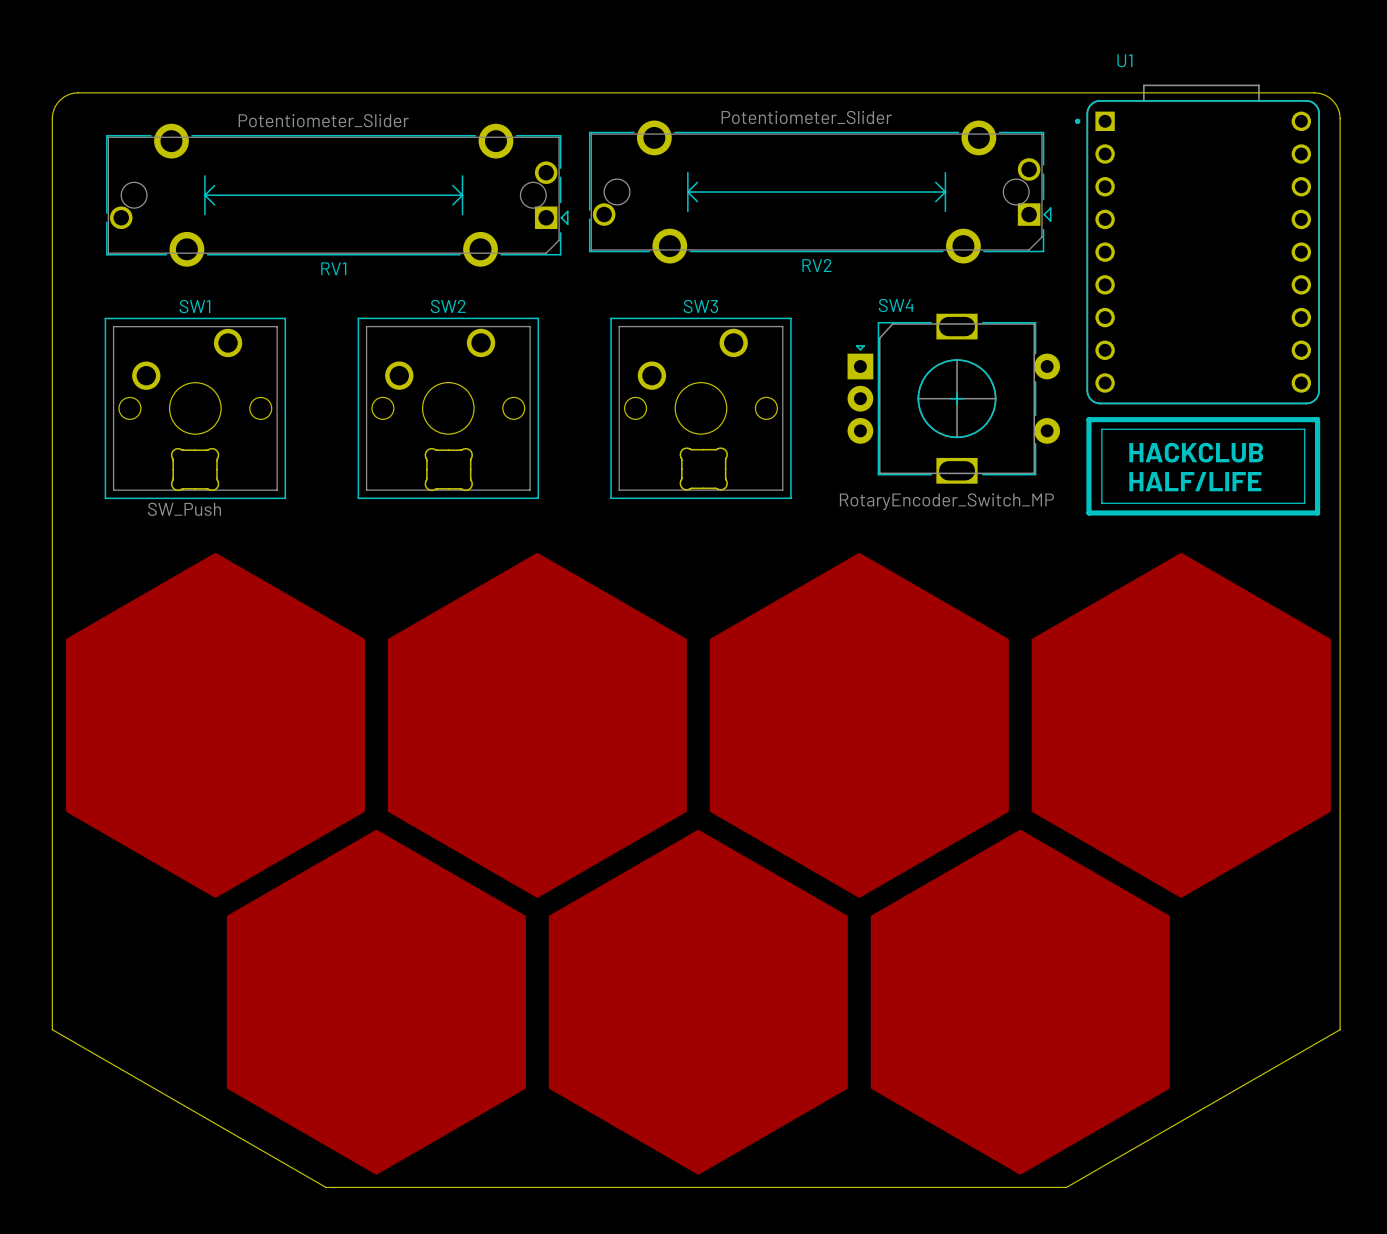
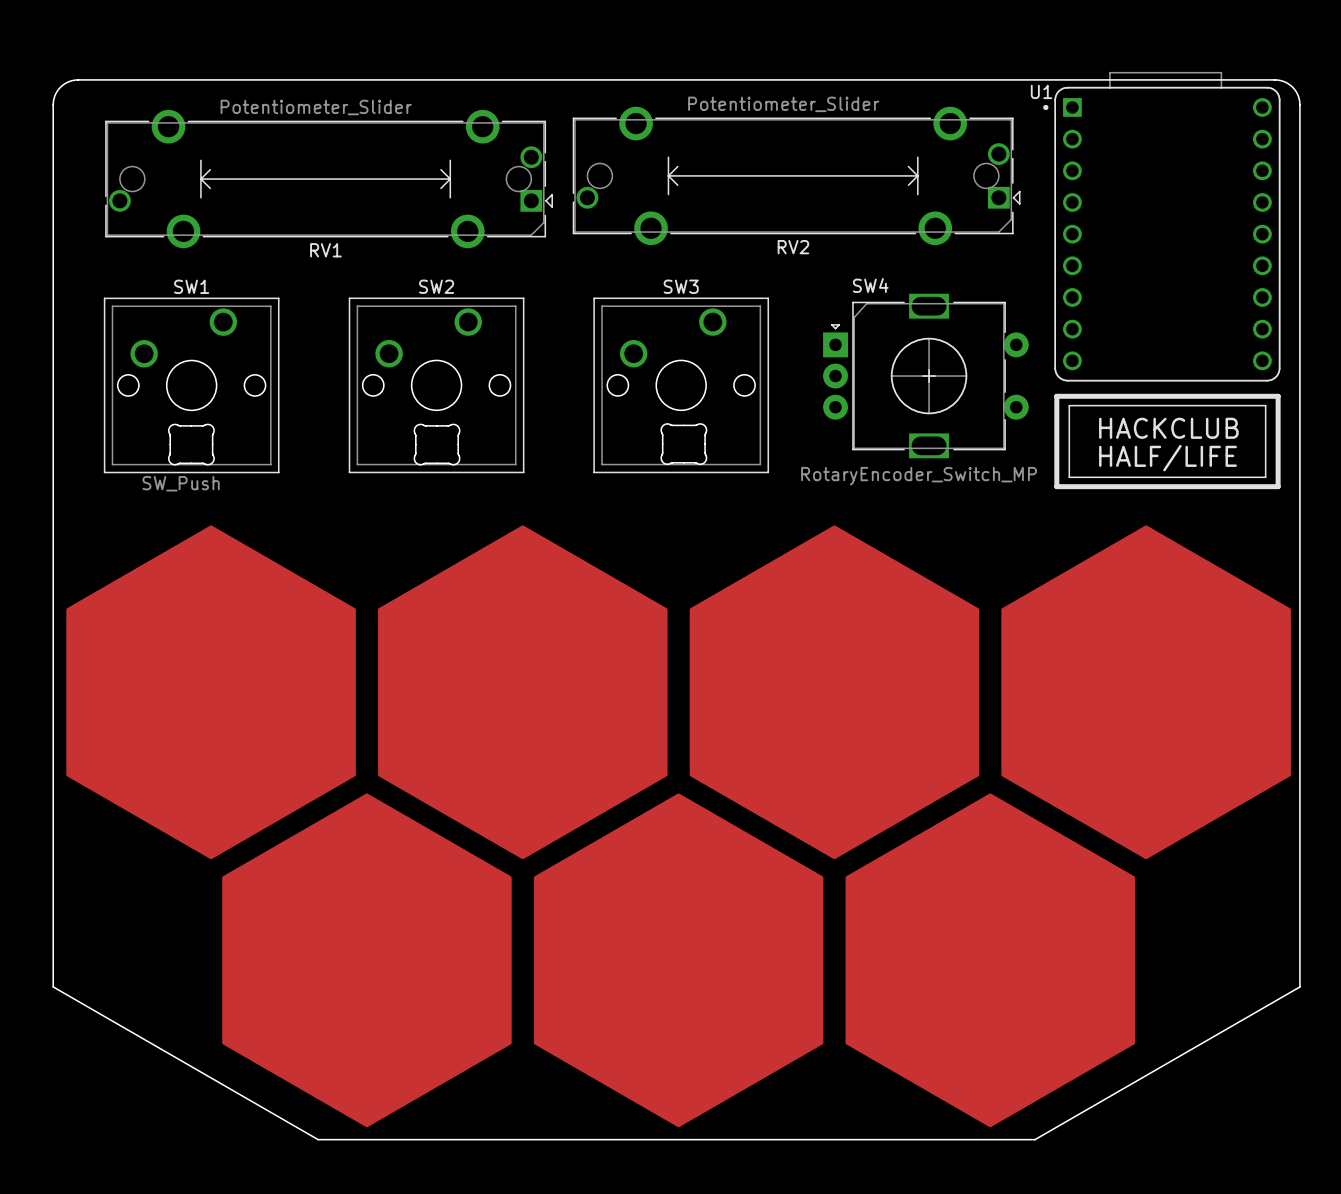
U1 name position: U1 (1124, 60) -> U1 (1041, 91)

